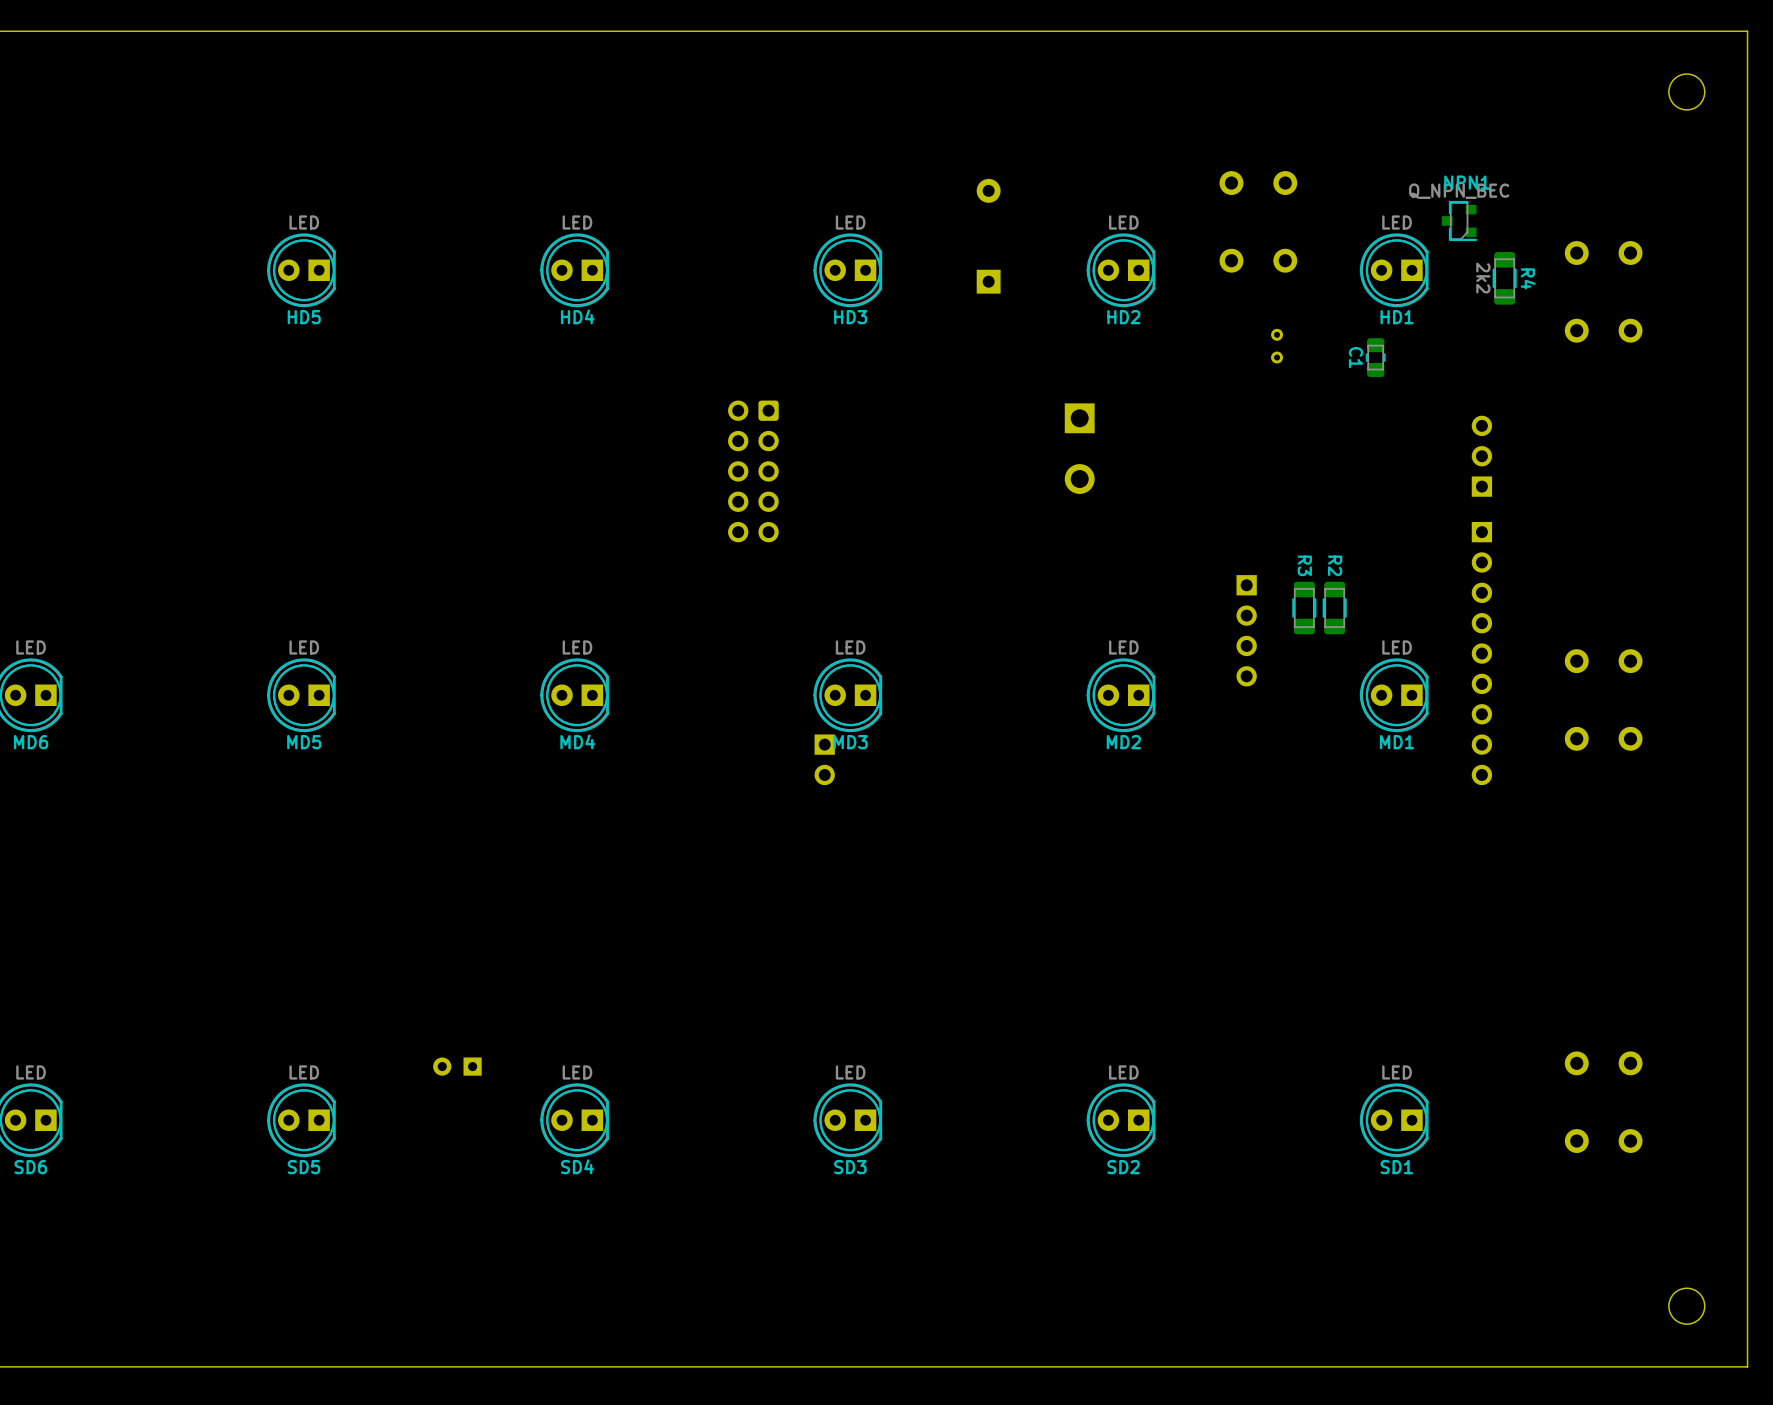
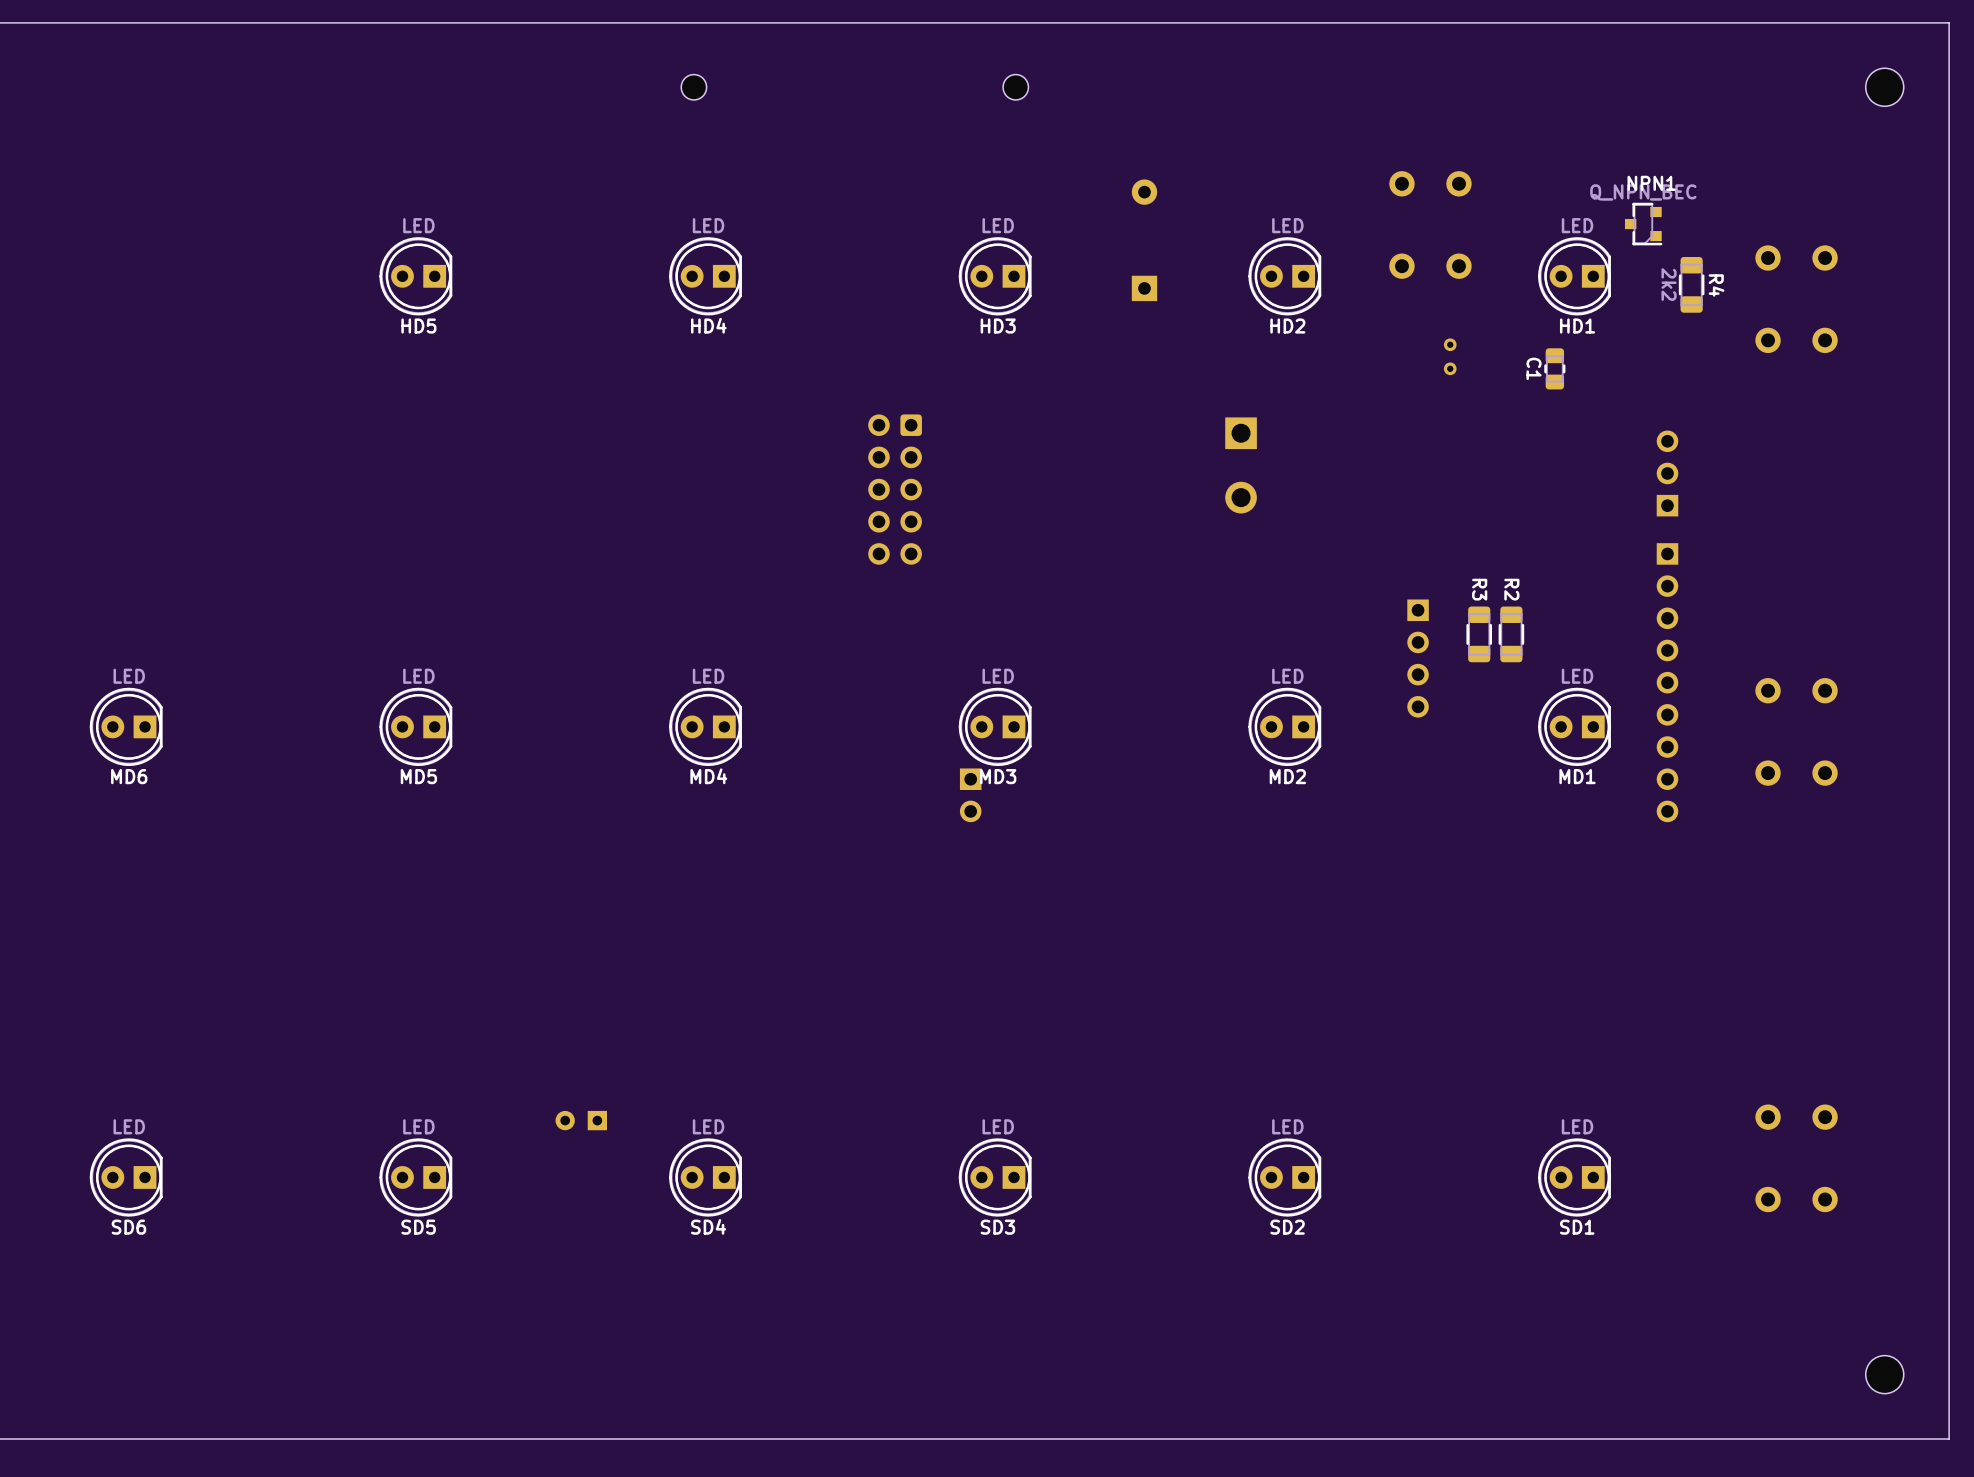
part: none -> (693, 87)
part: none -> (1015, 87)

